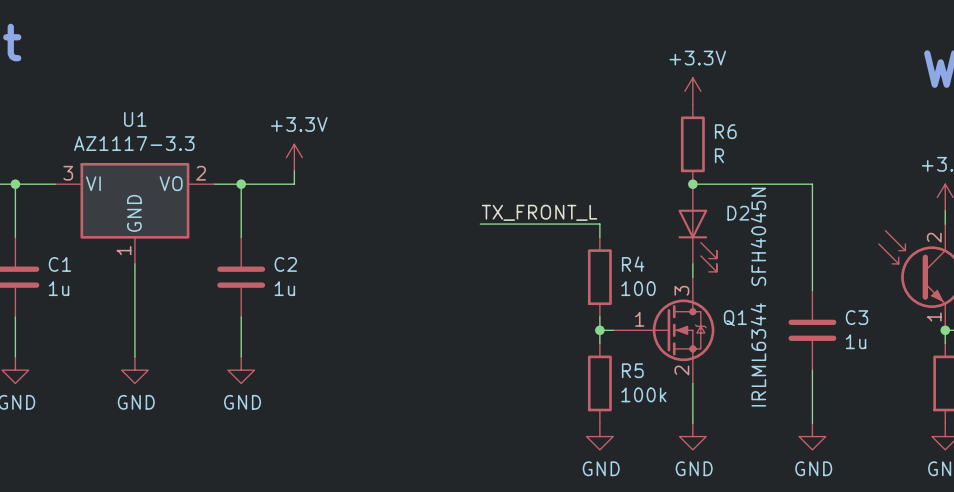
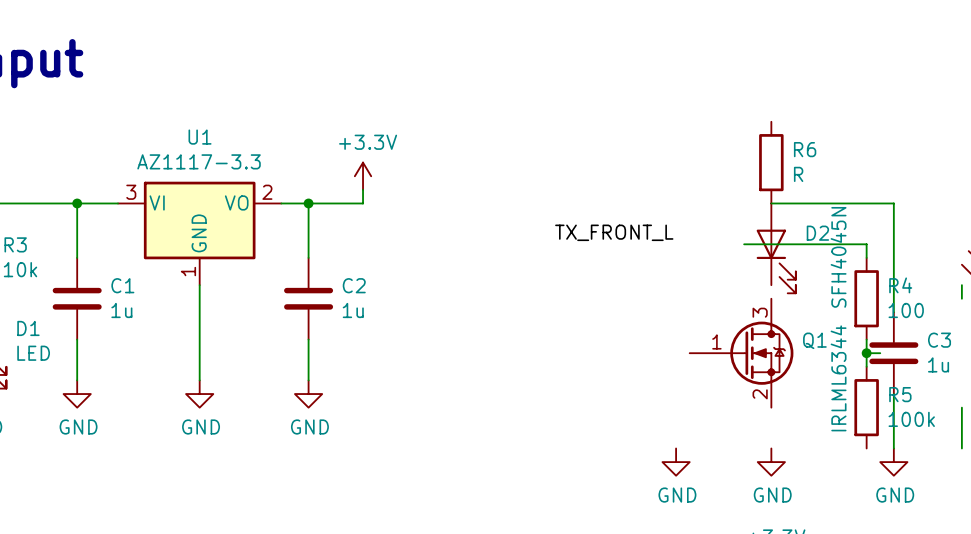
power symbol: +3.3V (692, 91) -> none
junction: (692, 184) -> none
wire: (480, 224) (599, 224) (599, 237) -> (744, 244) (866, 244) (866, 257)
wire: (692, 263) (692, 277) -> (961, 285) (961, 298)
R4 position: (599, 277) -> (866, 298)
wire: (599, 317) (599, 343) -> (866, 339) (866, 366)
wire: (599, 330) (613, 330) -> (866, 353) (880, 353)
junction: (599, 330) -> none
junction: none -> (866, 353)
R5 position: (599, 383) -> (866, 407)
wire: (692, 383) (692, 423) -> (961, 407) (961, 448)

